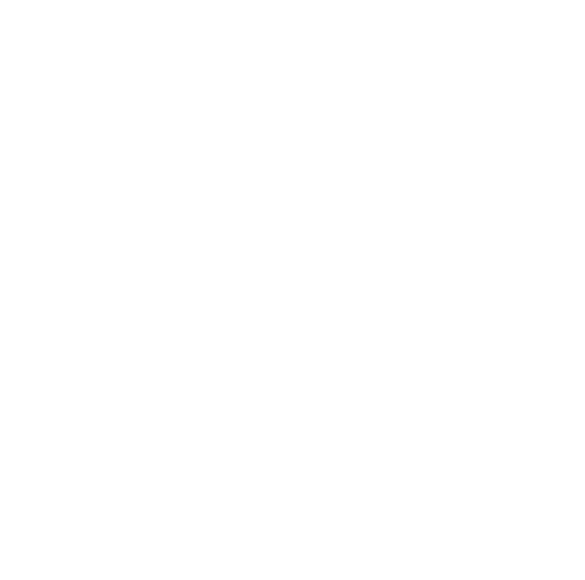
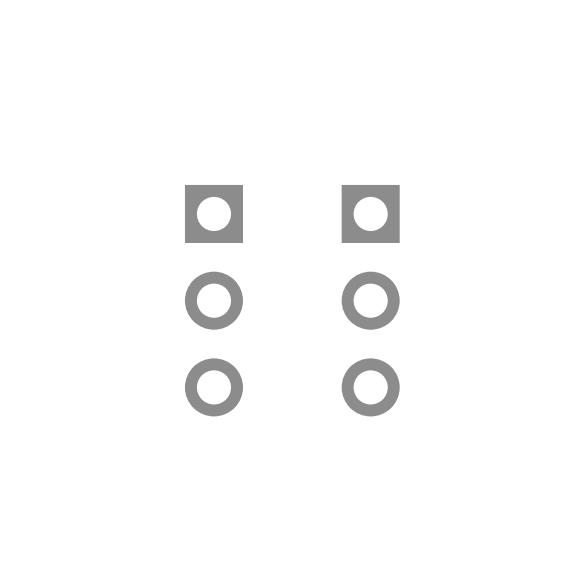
part: none -> (213, 300)
part: none -> (370, 300)

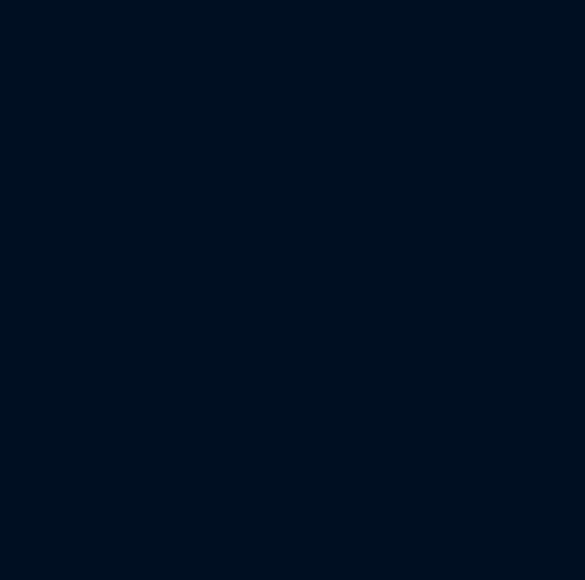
part: (213, 300) -> none
part: (370, 300) -> none

